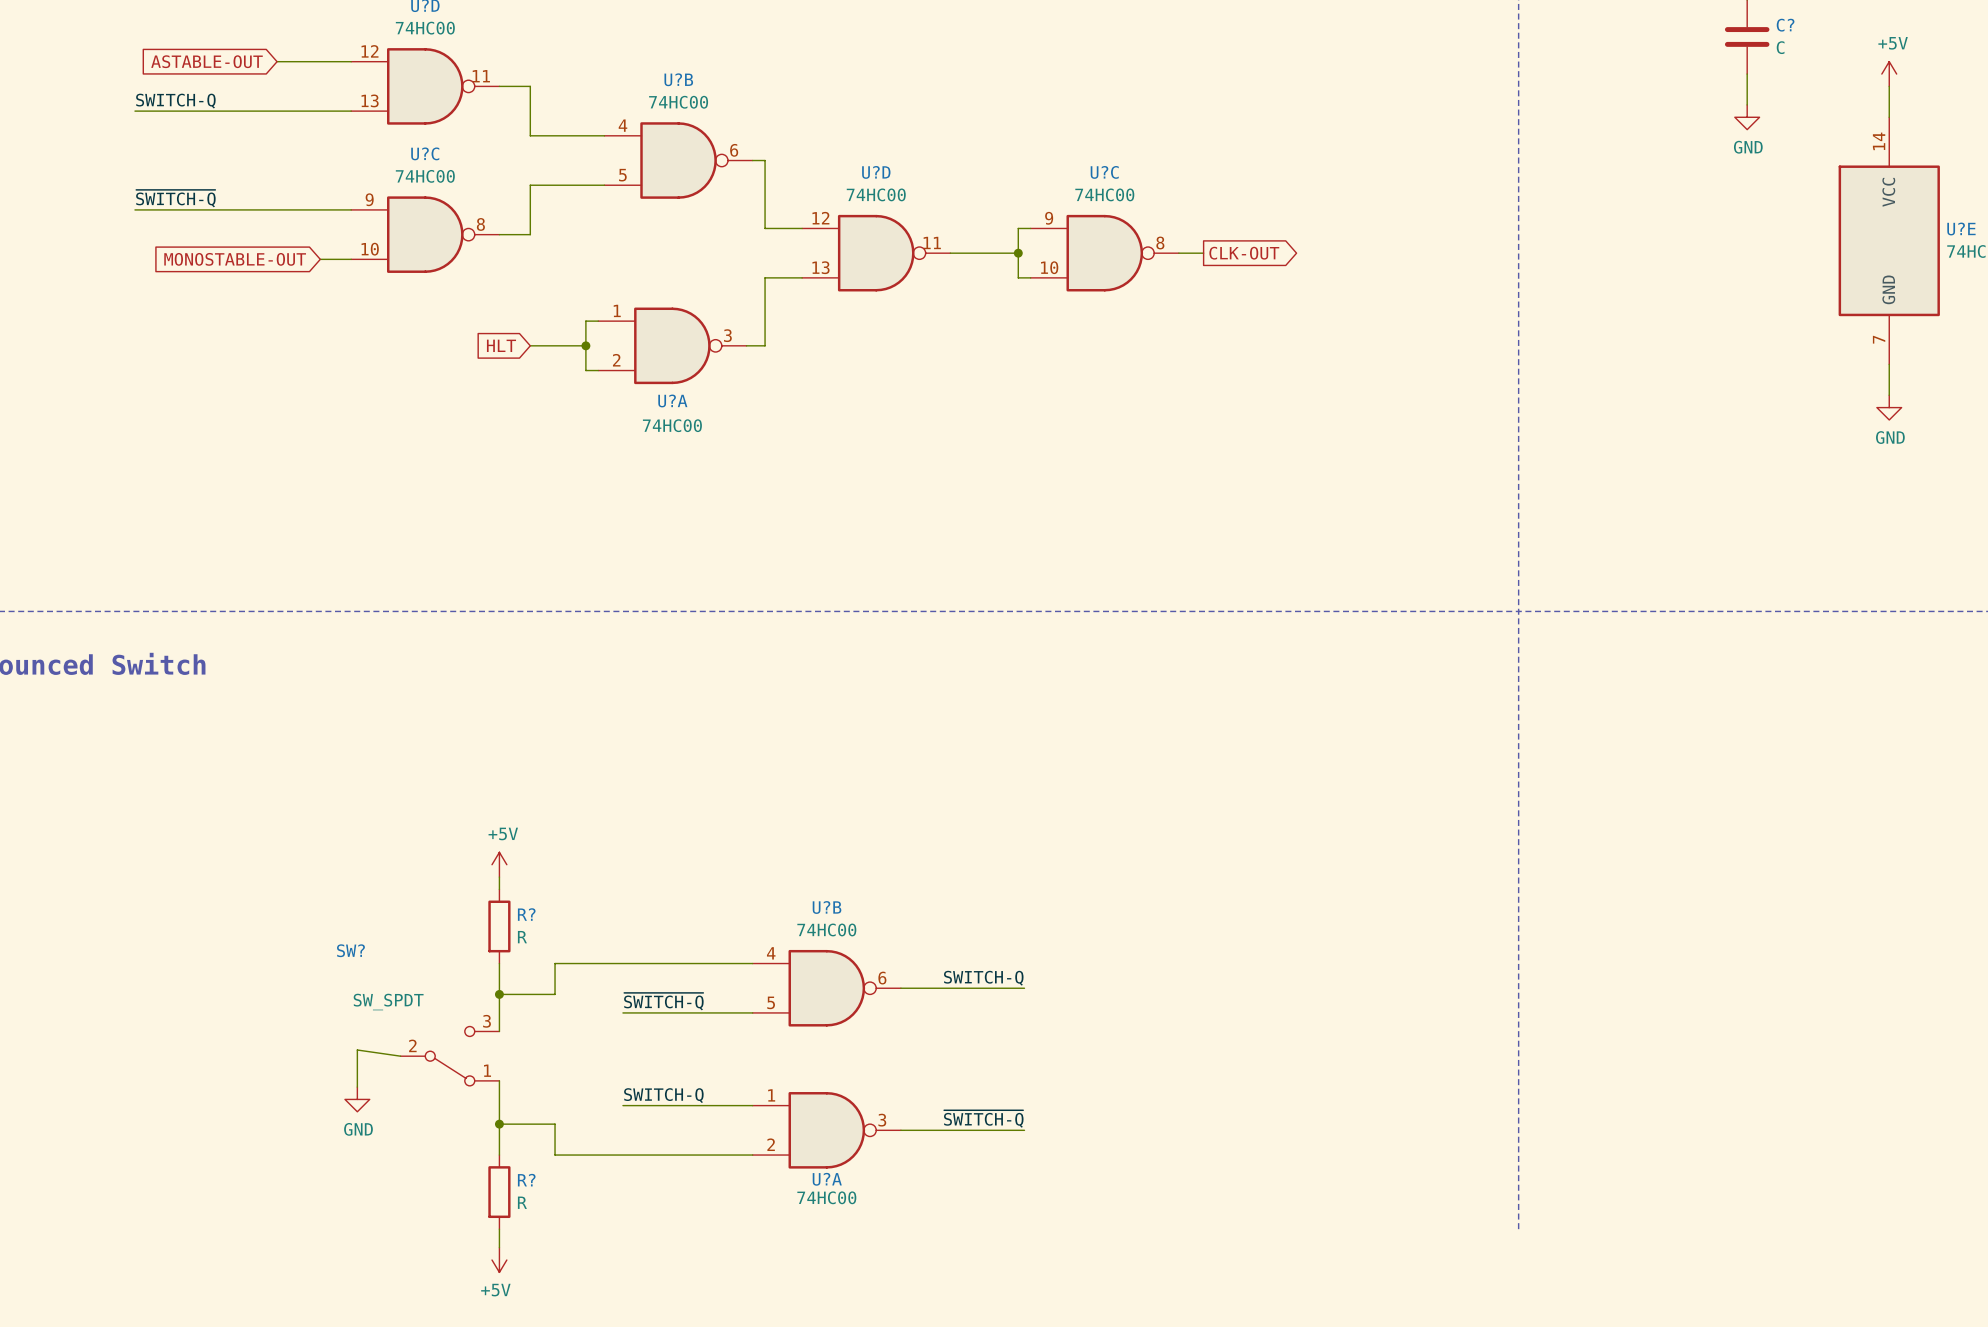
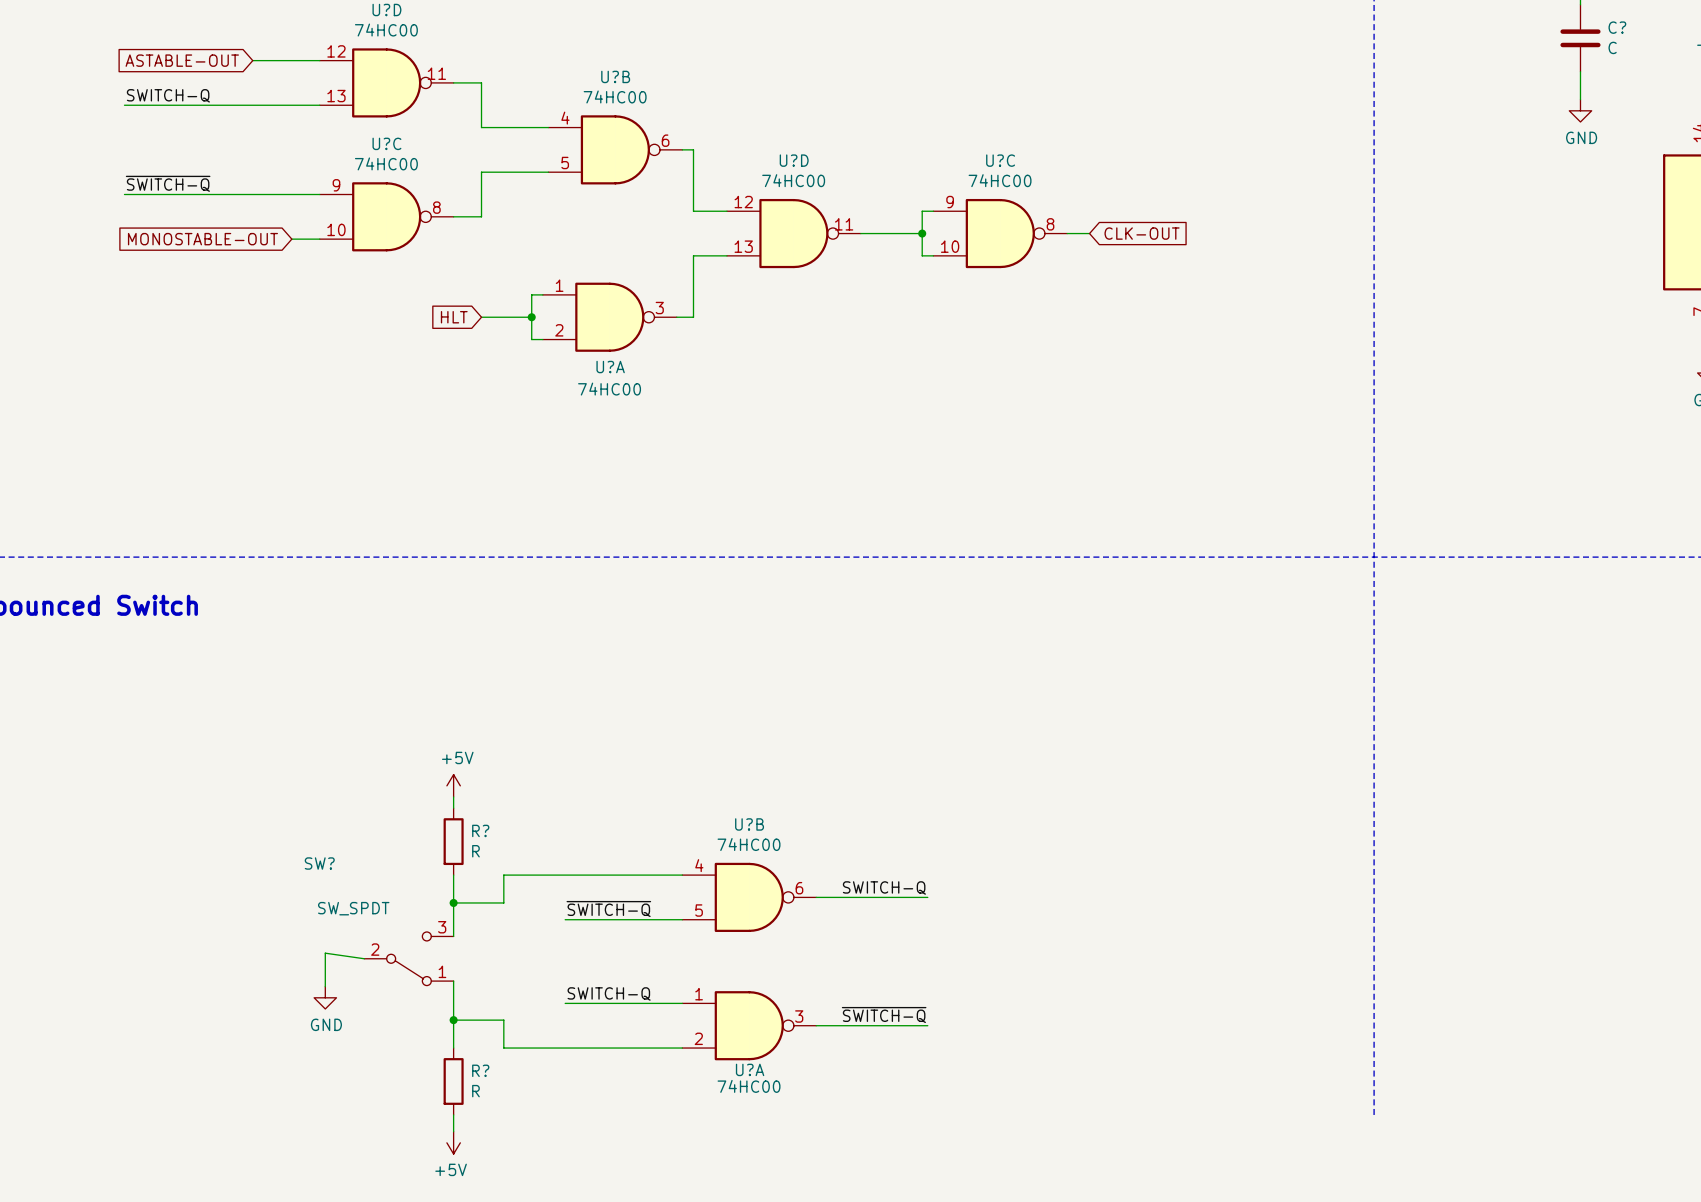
global label shape: output (1244, 253) -> input (1142, 233)

